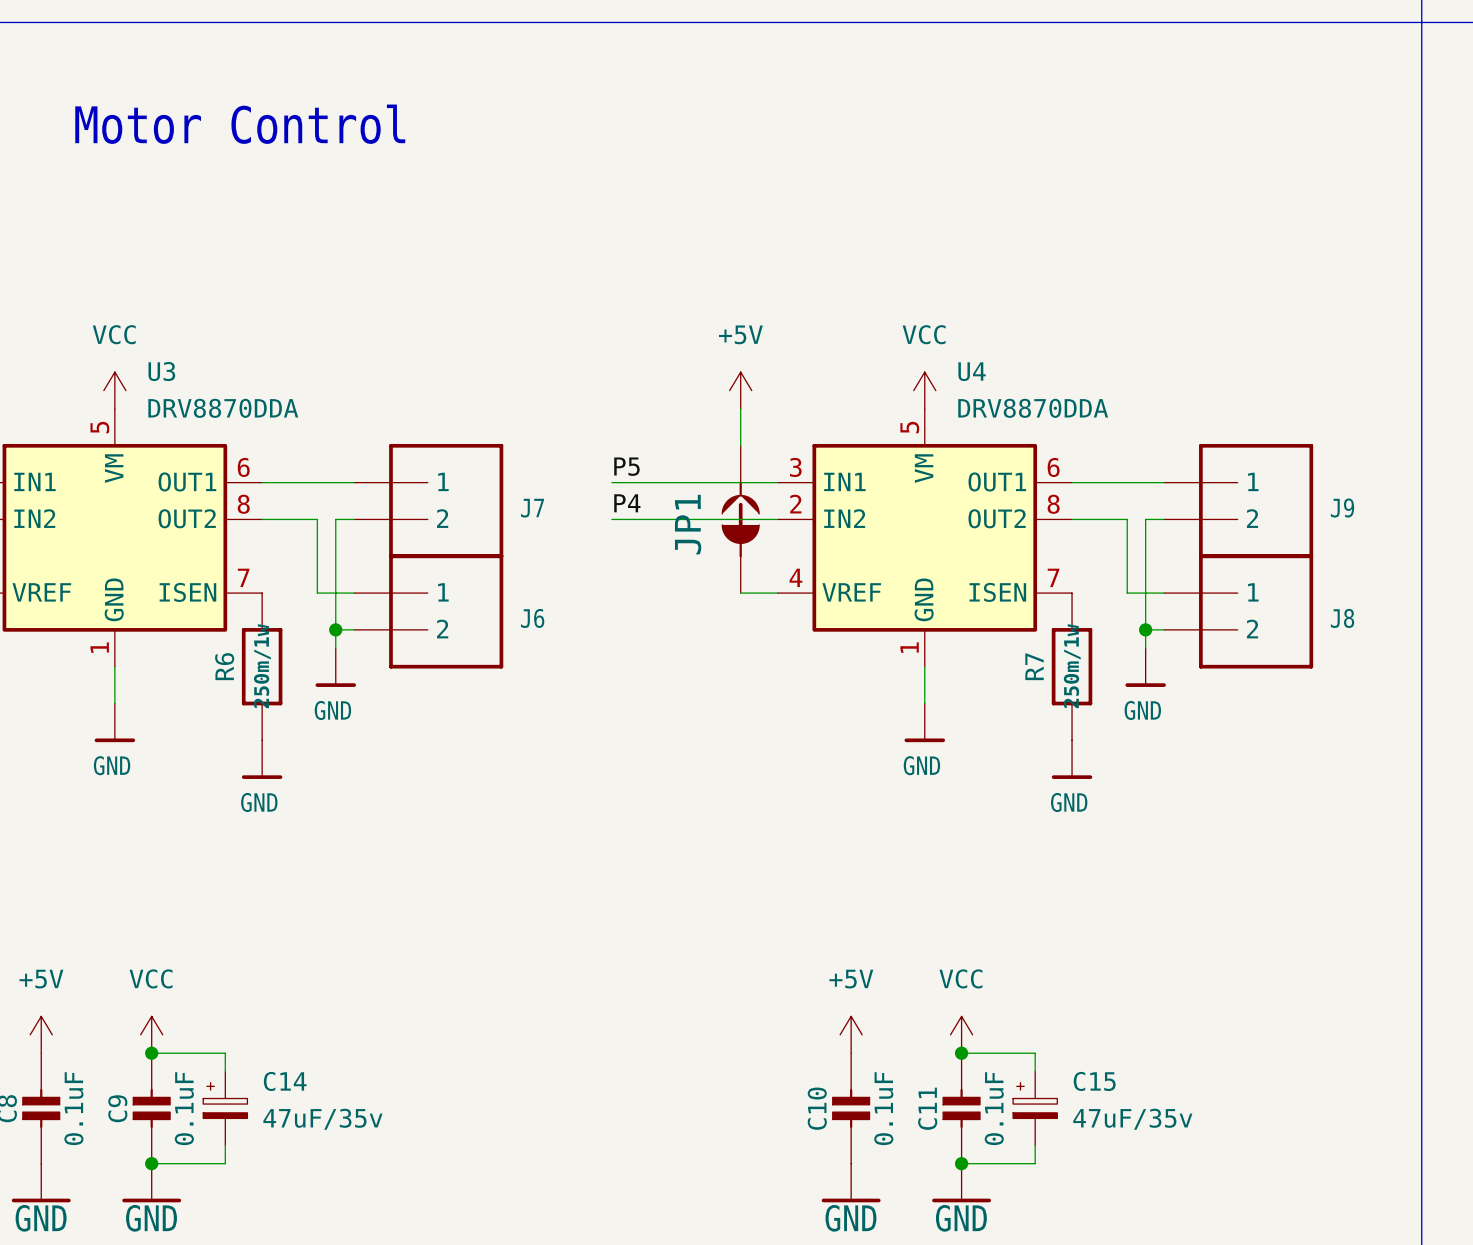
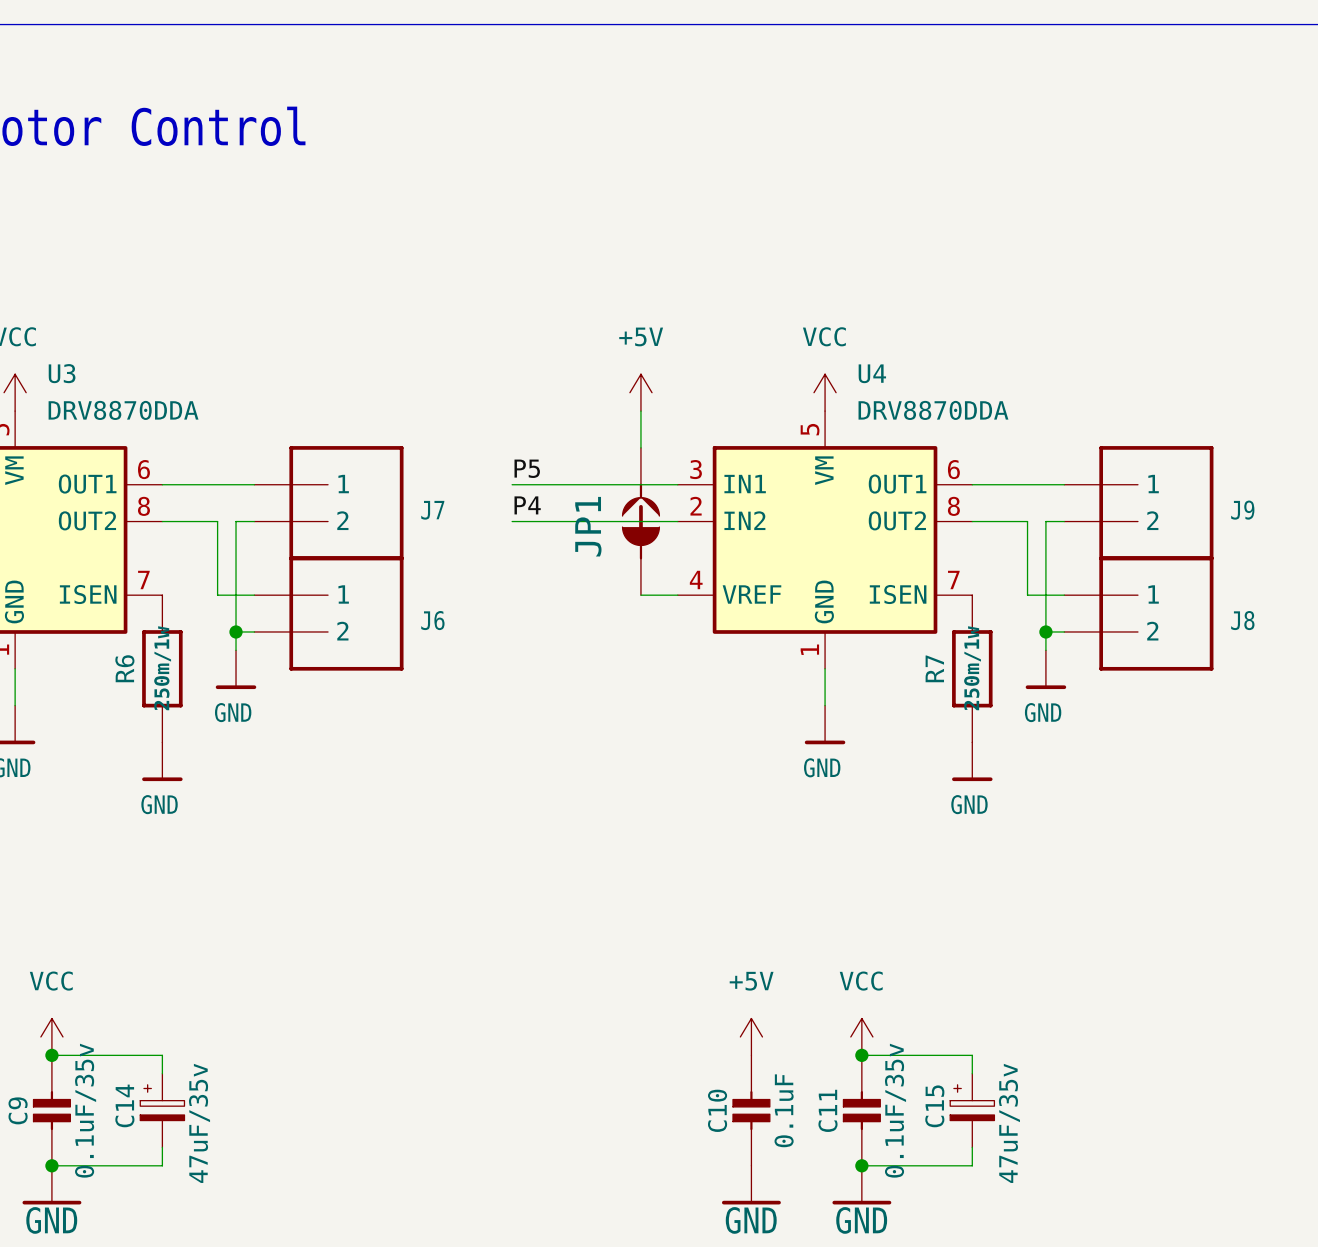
wire: (225, 1053) (225, 1071) -> (125, 1055) (162, 1055) (162, 1073)
wire: (1035, 1053) (1035, 1071) -> (935, 1055) (972, 1055) (972, 1073)
C14 name rotation: 0° (285, 1081) -> 90° counterclockwise (124, 1105)
C14 name position: C14 (285, 1081) -> C14 (124, 1105)
C15 name rotation: 0° (1094, 1081) -> 90° counterclockwise (934, 1106)
C15 name position: C15 (1094, 1081) -> C15 (934, 1106)
C9 value: 0.1uF (184, 1108) -> 0.1uF/35v (85, 1110)
C14 position: (225, 1108) -> (162, 1110)
C11 value: 0.1uF (994, 1108) -> 0.1uF/35v (895, 1110)
C15 position: (1035, 1108) -> (972, 1110)
C14 value rotation: 0° (322, 1119) -> 90° counterclockwise (199, 1123)
C15 value rotation: 0° (1132, 1119) -> 90° counterclockwise (1009, 1123)
wire: (225, 1145) (225, 1163) -> (162, 1147) (162, 1165) (125, 1165)
wire: (1035, 1145) (1035, 1163) -> (972, 1147) (972, 1165) (935, 1165)

